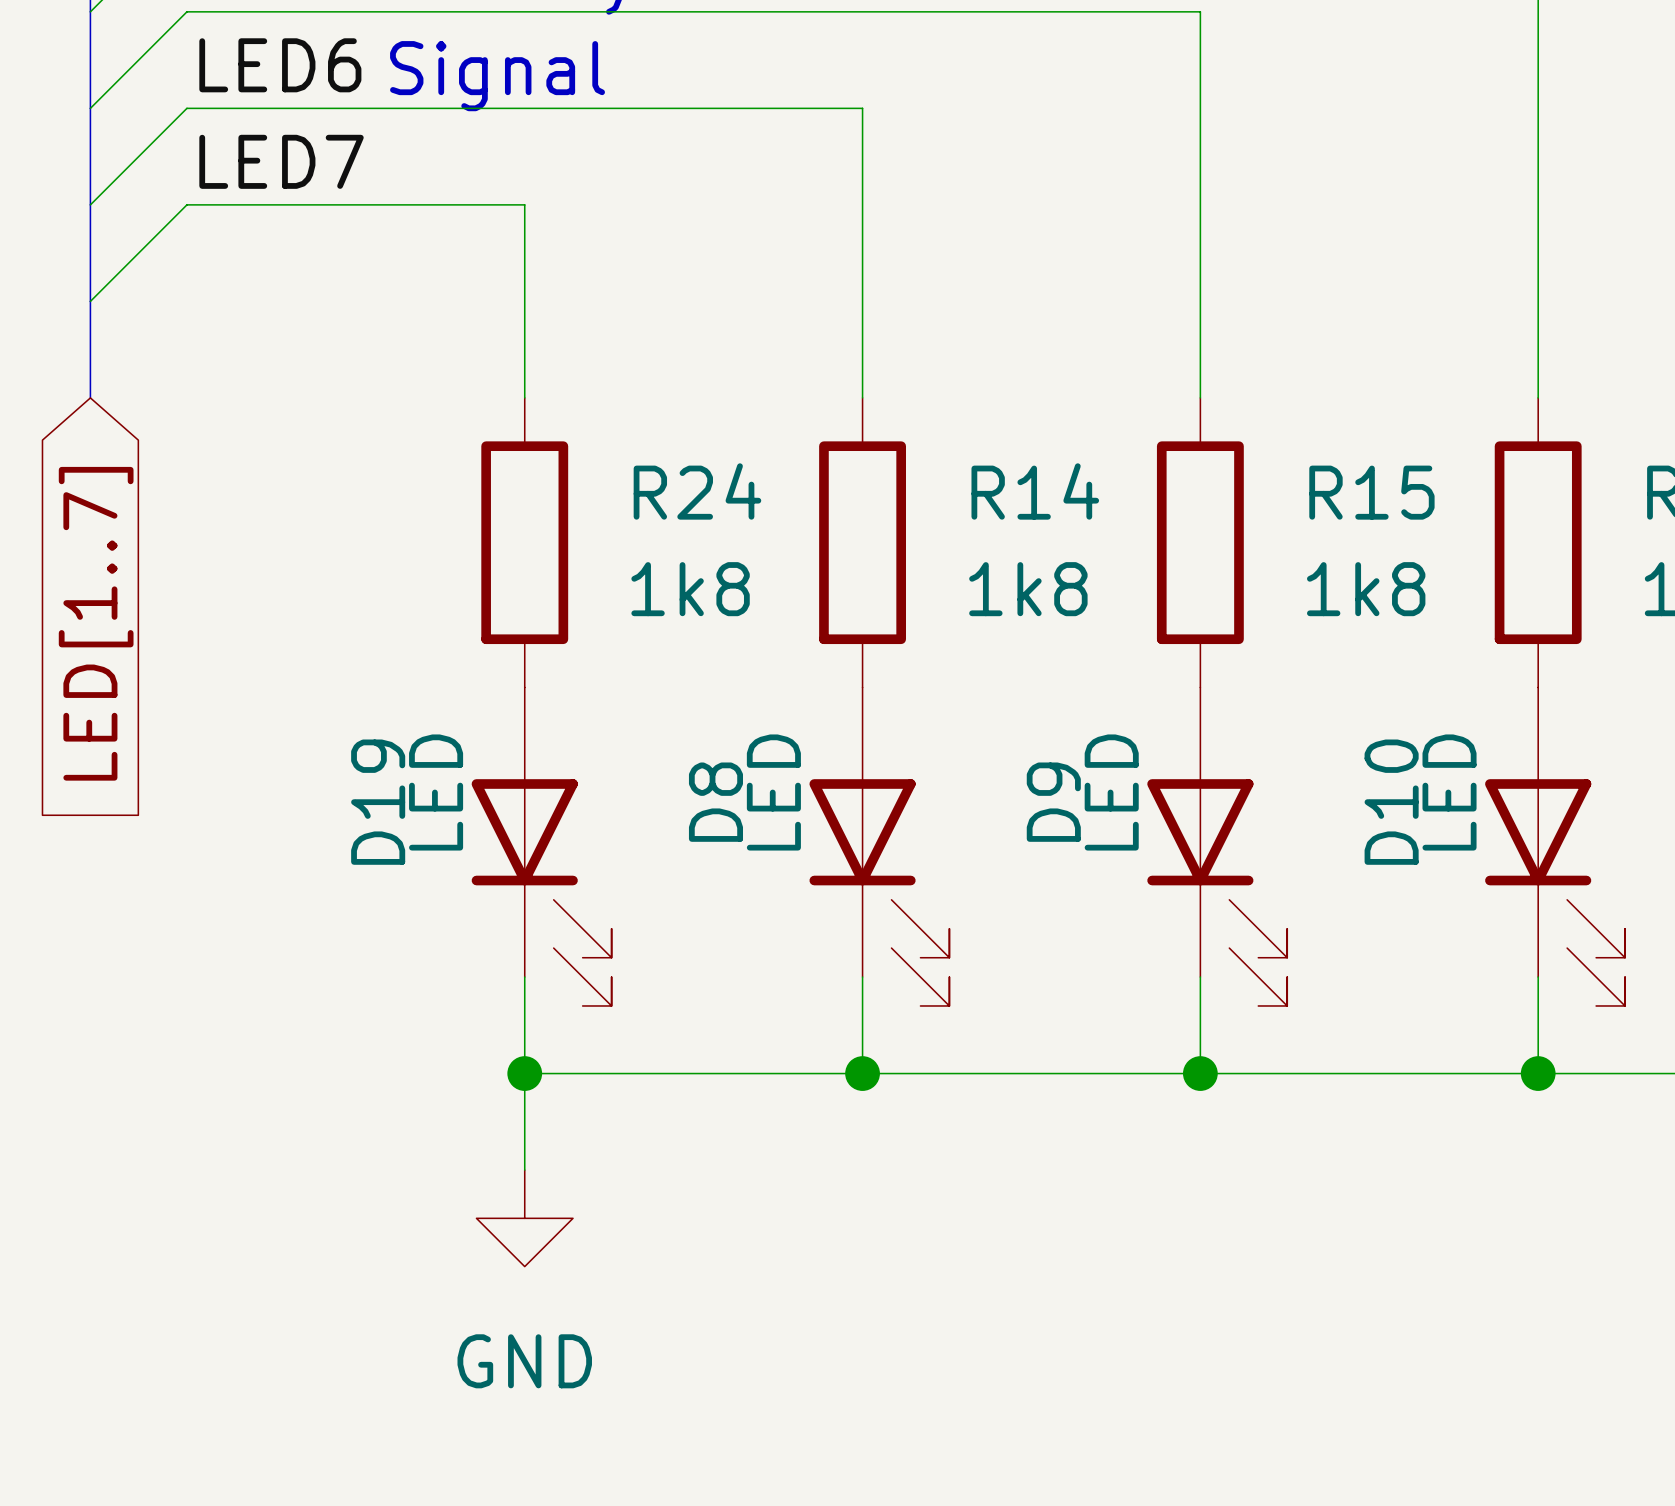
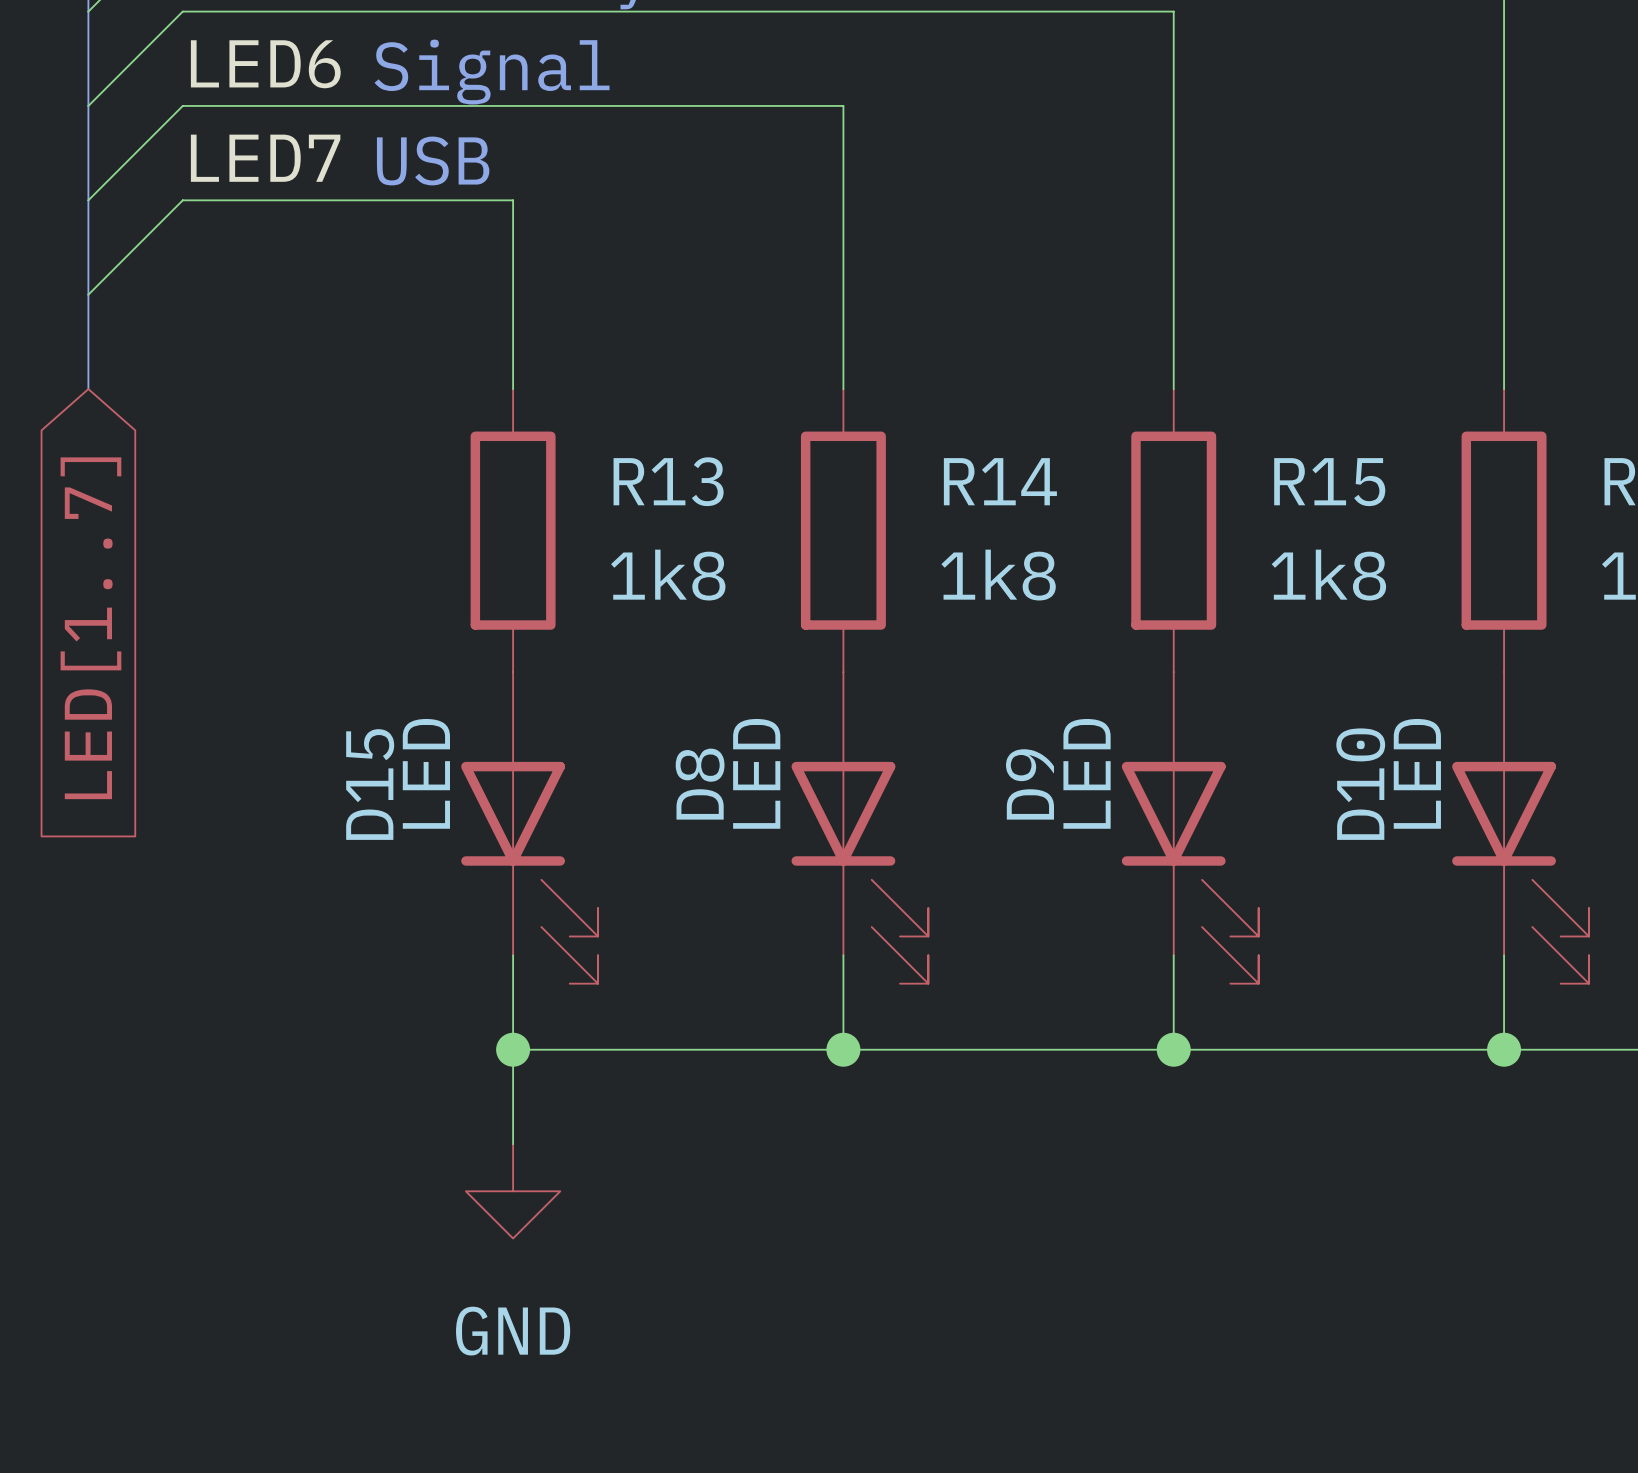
text: none -> USB (433, 160)
R24 name: R24 (697, 491) -> R13 (668, 481)
D19 name: D19 (378, 802) -> D15 (370, 784)

